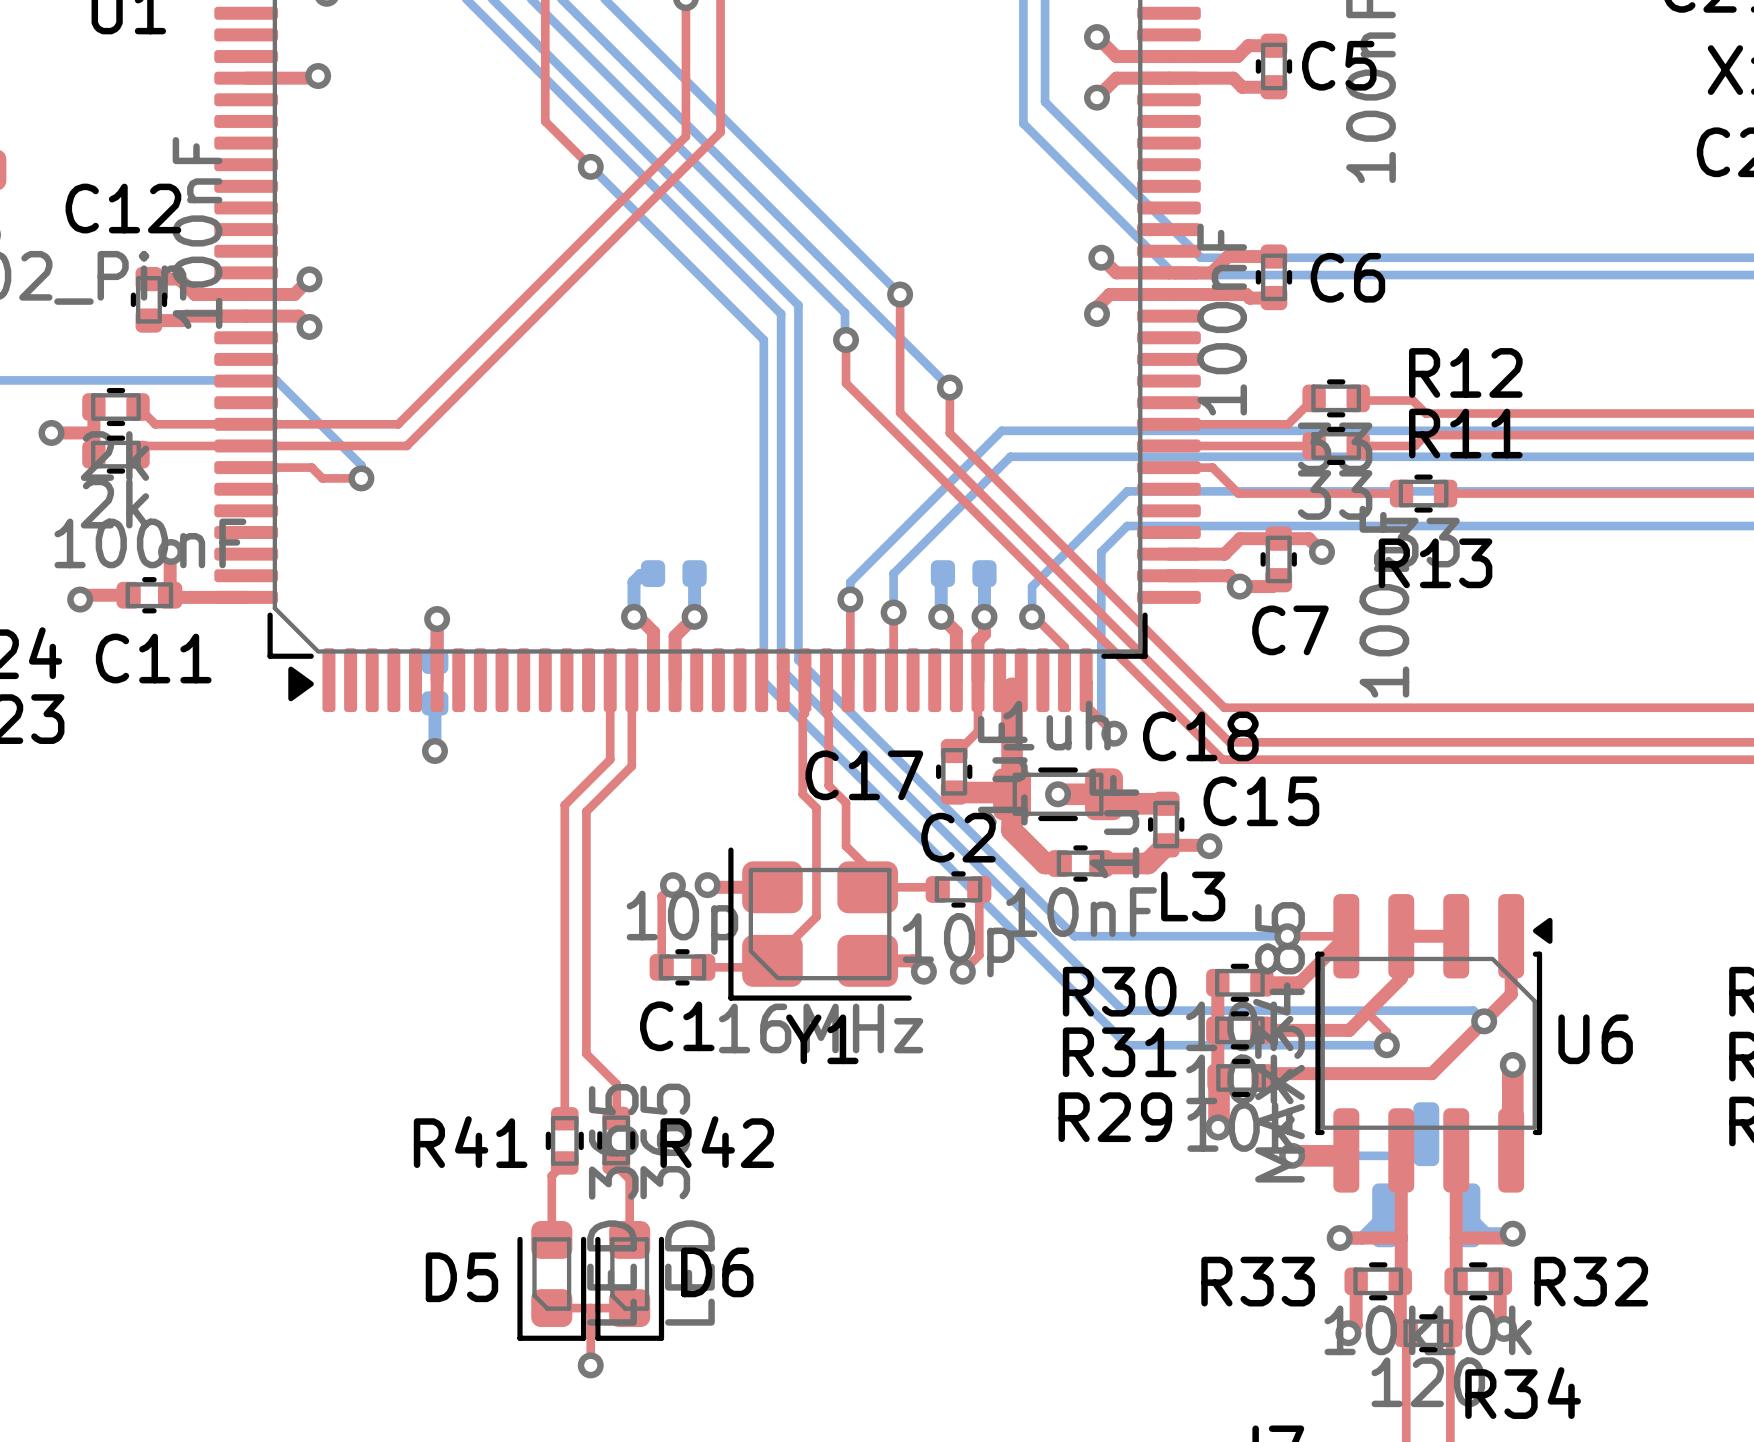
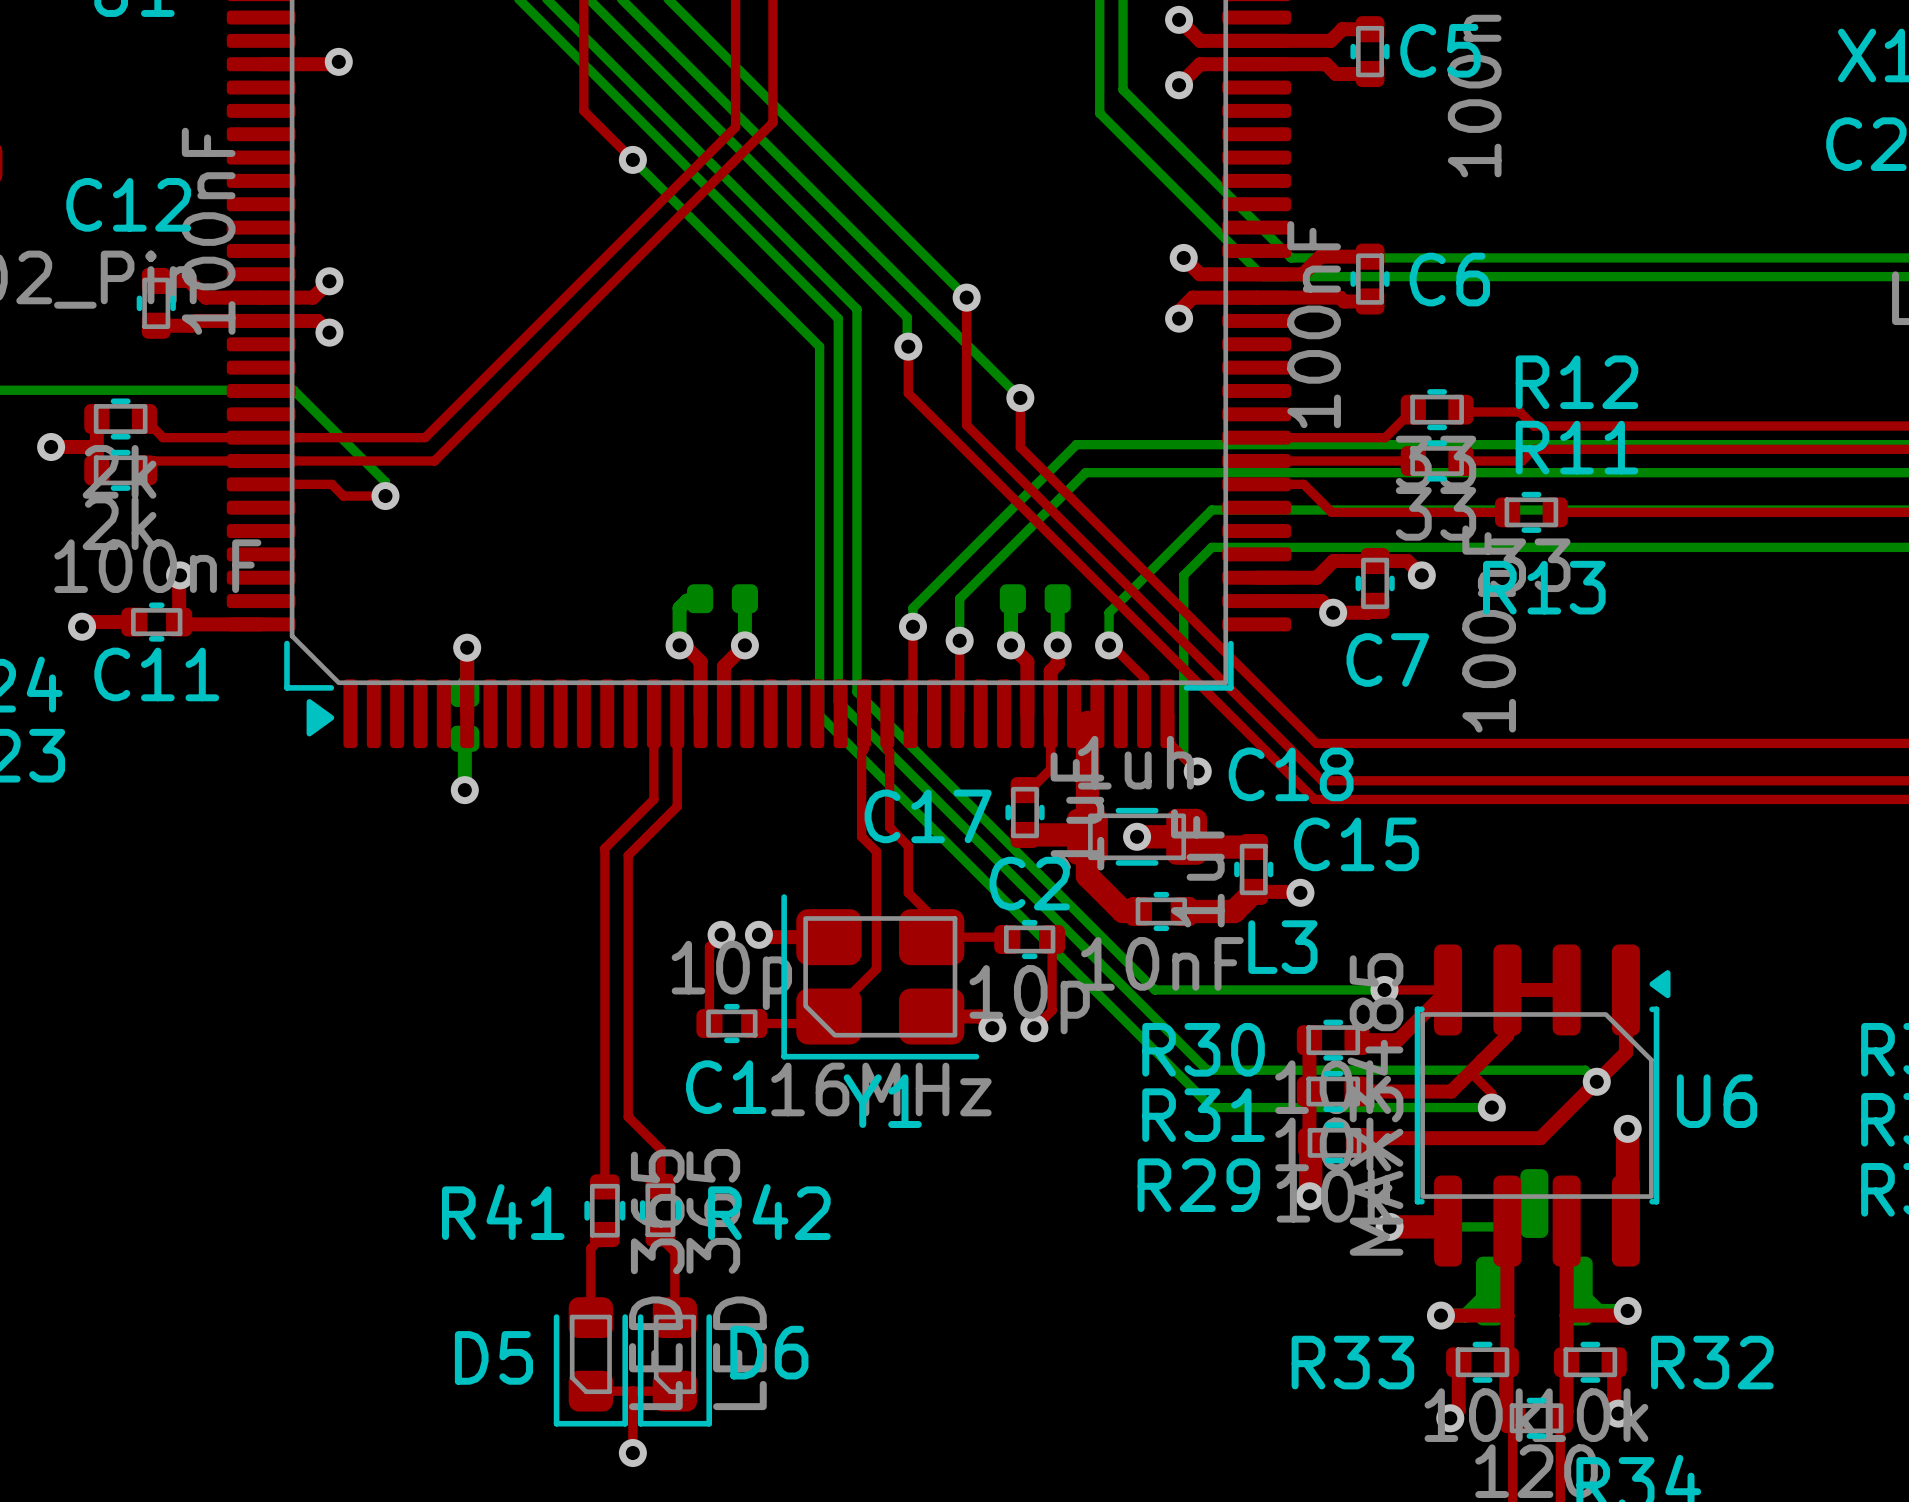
C11 name position: C11 (153, 658) -> C11 (156, 674)

